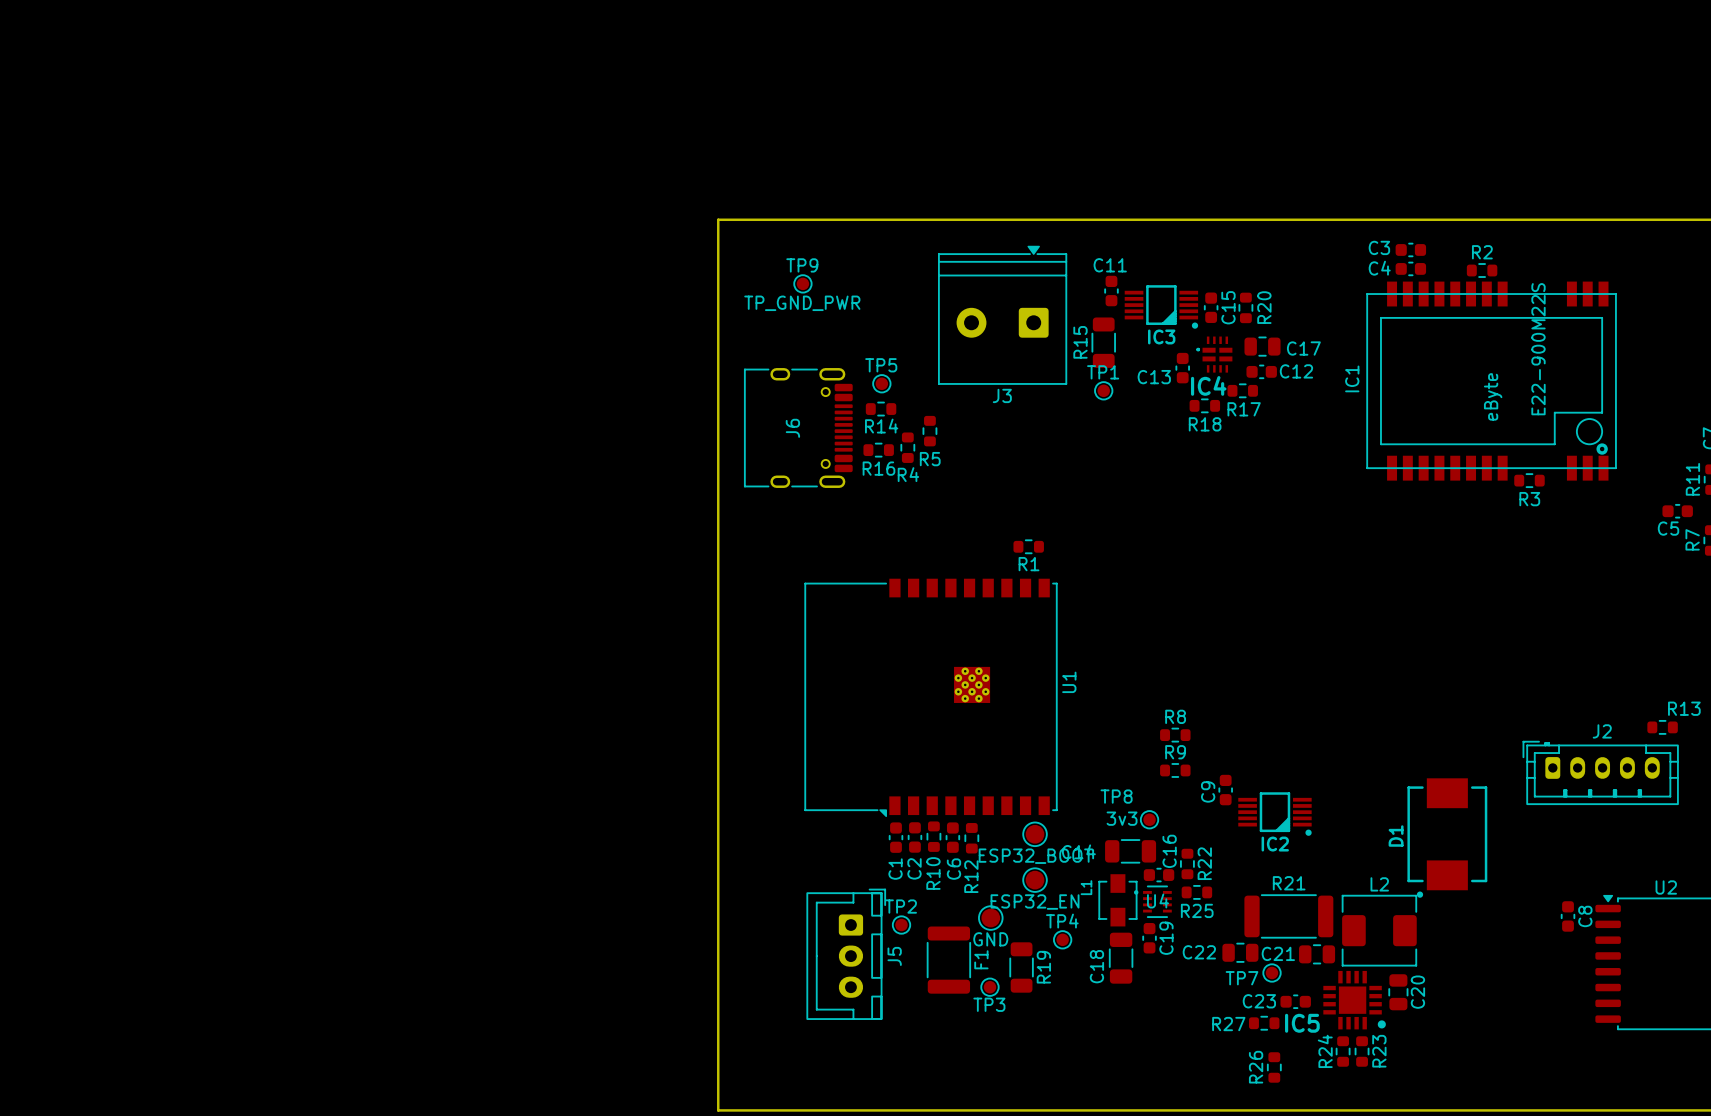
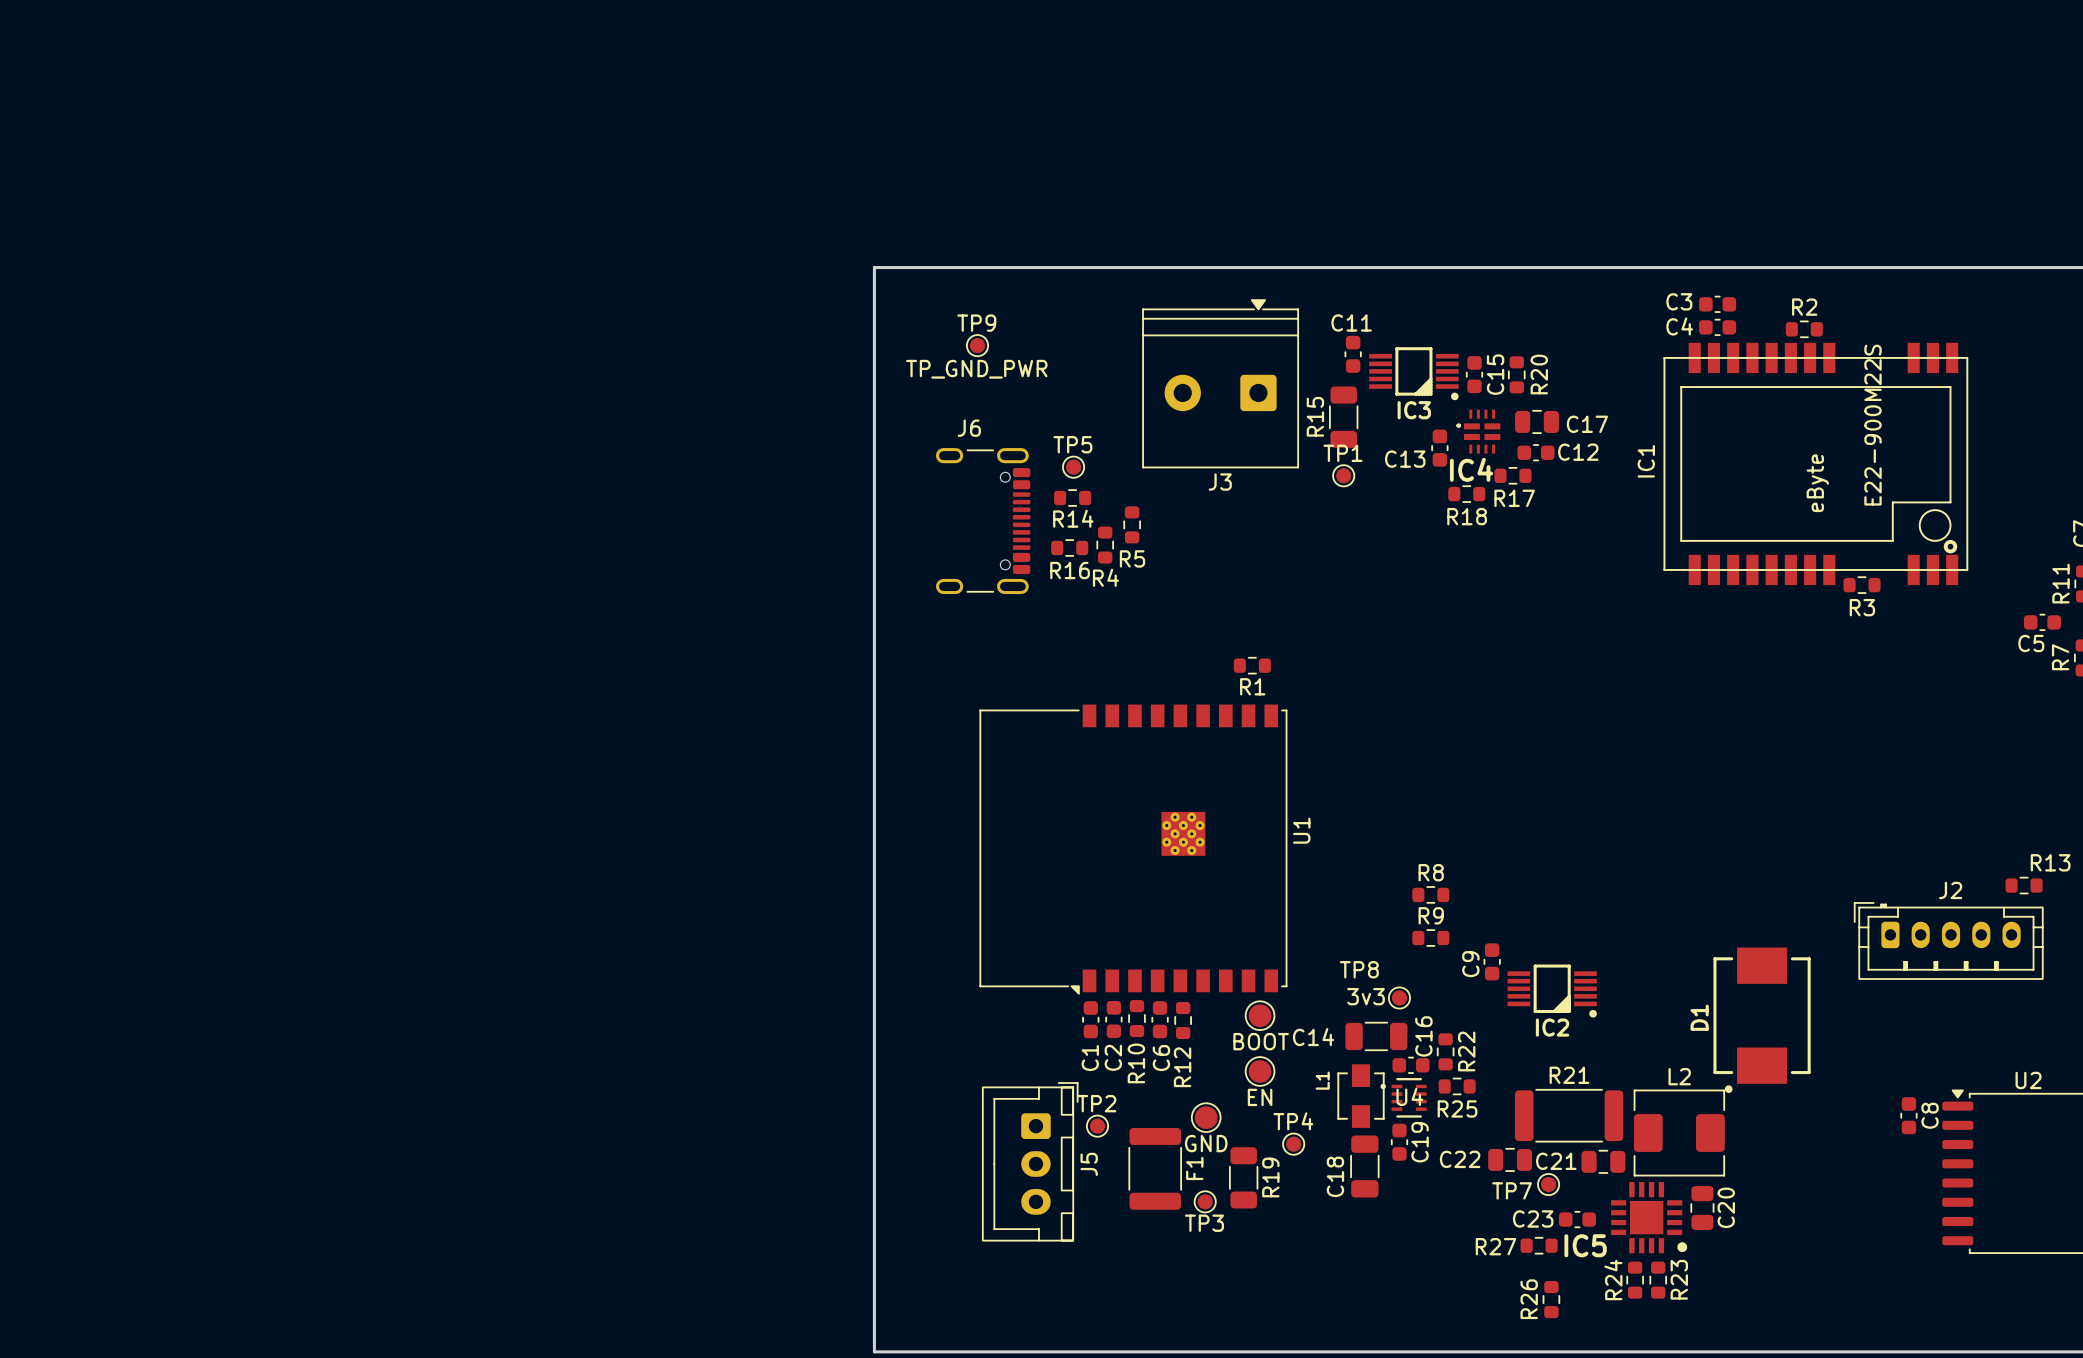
J6 footprint: [744, 368, 853, 488] -> [935, 448, 1031, 595]
J6 name position: J6 (792, 428) -> J6 (969, 428)
part value: ESP32_BOOT (1035, 856) -> BOOT (1261, 1041)
part value: ESP32_EN (1035, 902) -> EN (1260, 1097)

